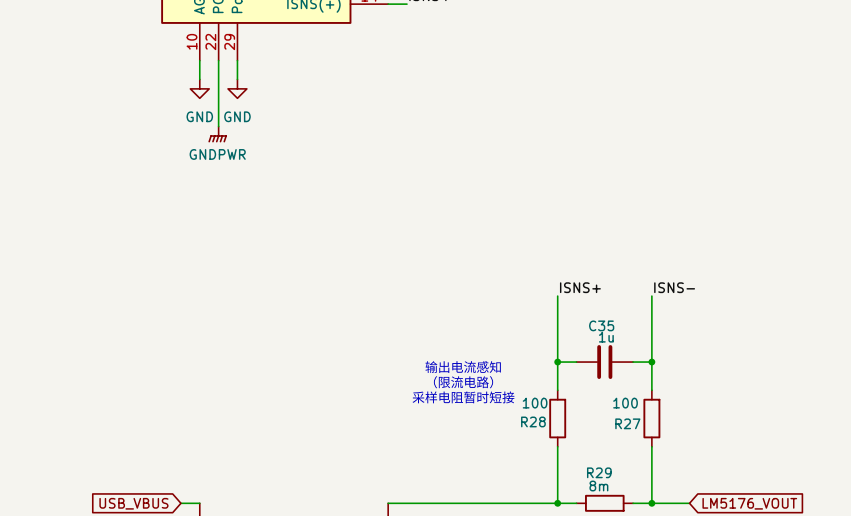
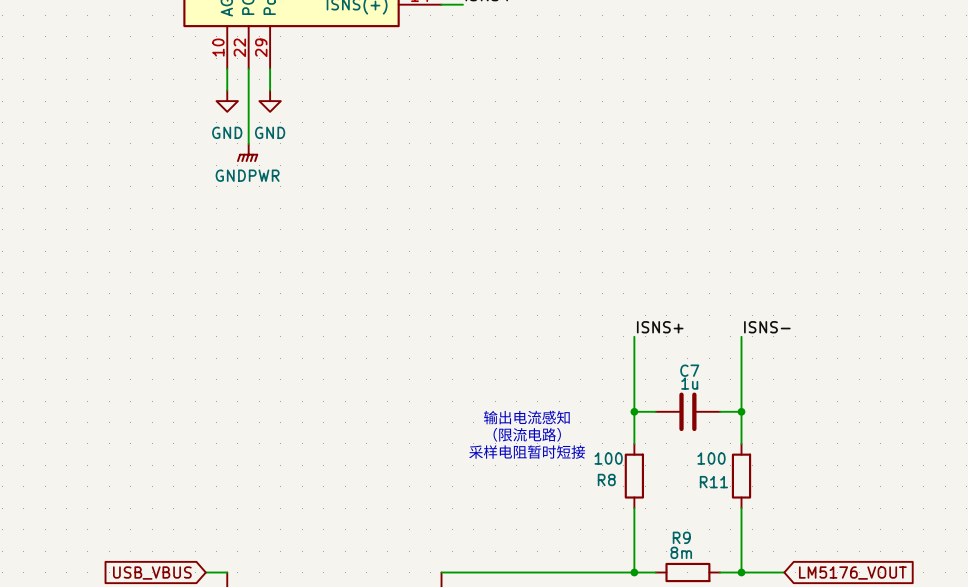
C35 name: C35 (601, 325) -> C7 (689, 370)
R28 name: R28 (533, 421) -> R8 (606, 479)
R27 name: R27 (627, 423) -> R11 (713, 482)
R29 name: R29 (599, 472) -> R9 (681, 537)

